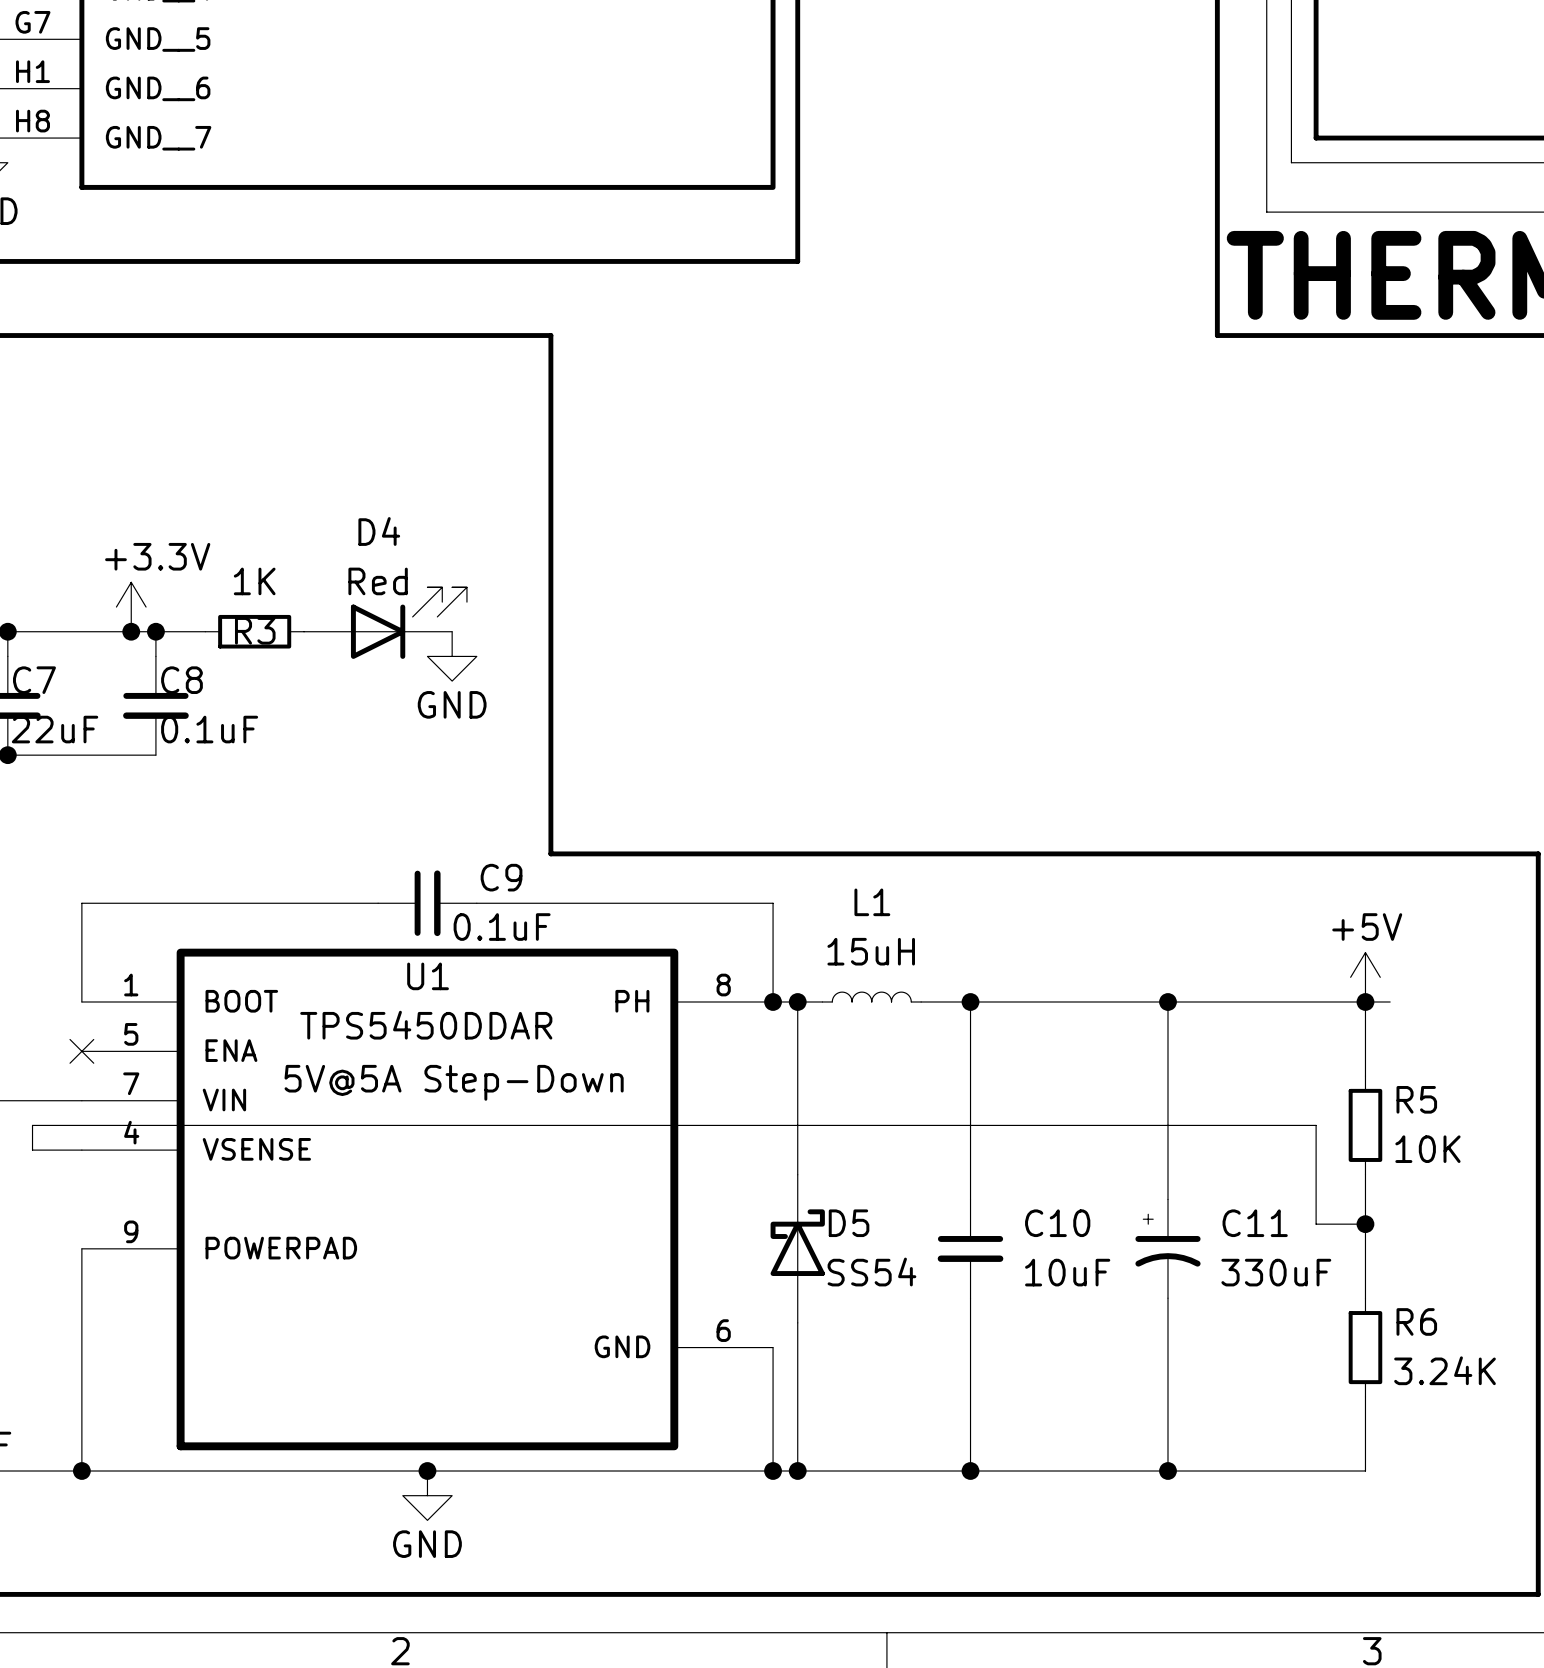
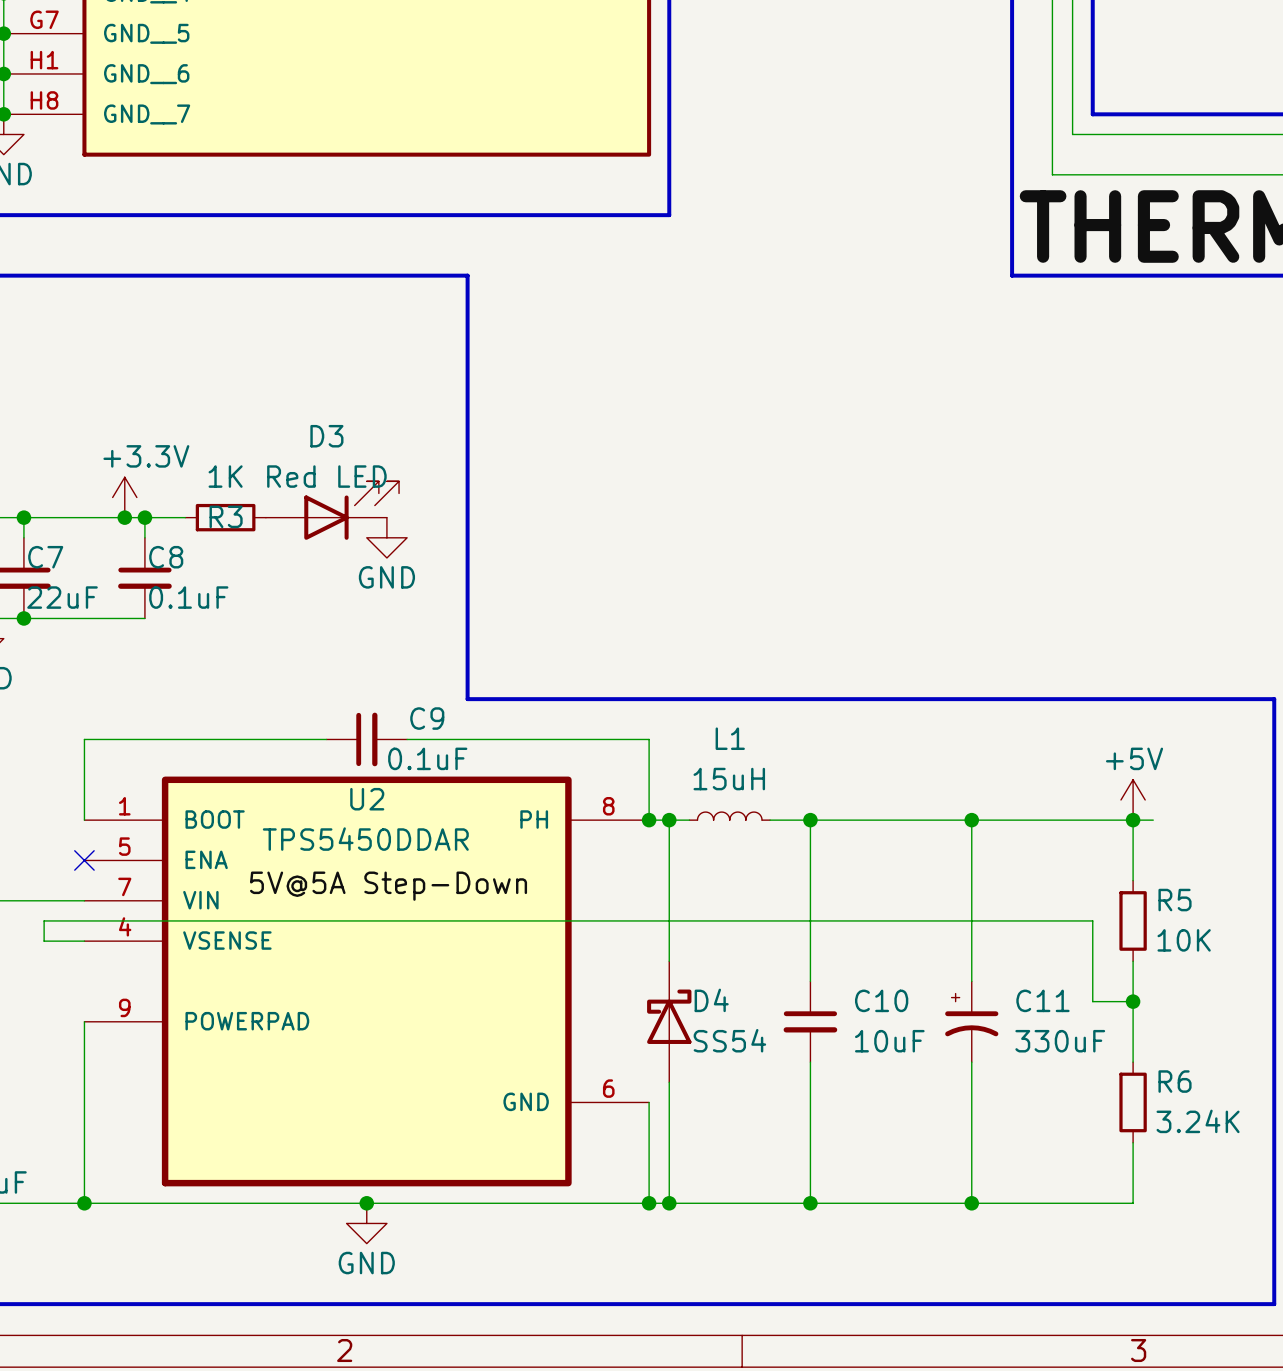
D4 name: D4 (379, 531) -> D3 (326, 436)
D4 value: Red (378, 581) -> Red LED (326, 476)
U1 name: U1 (428, 976) -> U2 (367, 799)
D5 name: D5 (849, 1223) -> D4 (711, 1000)

